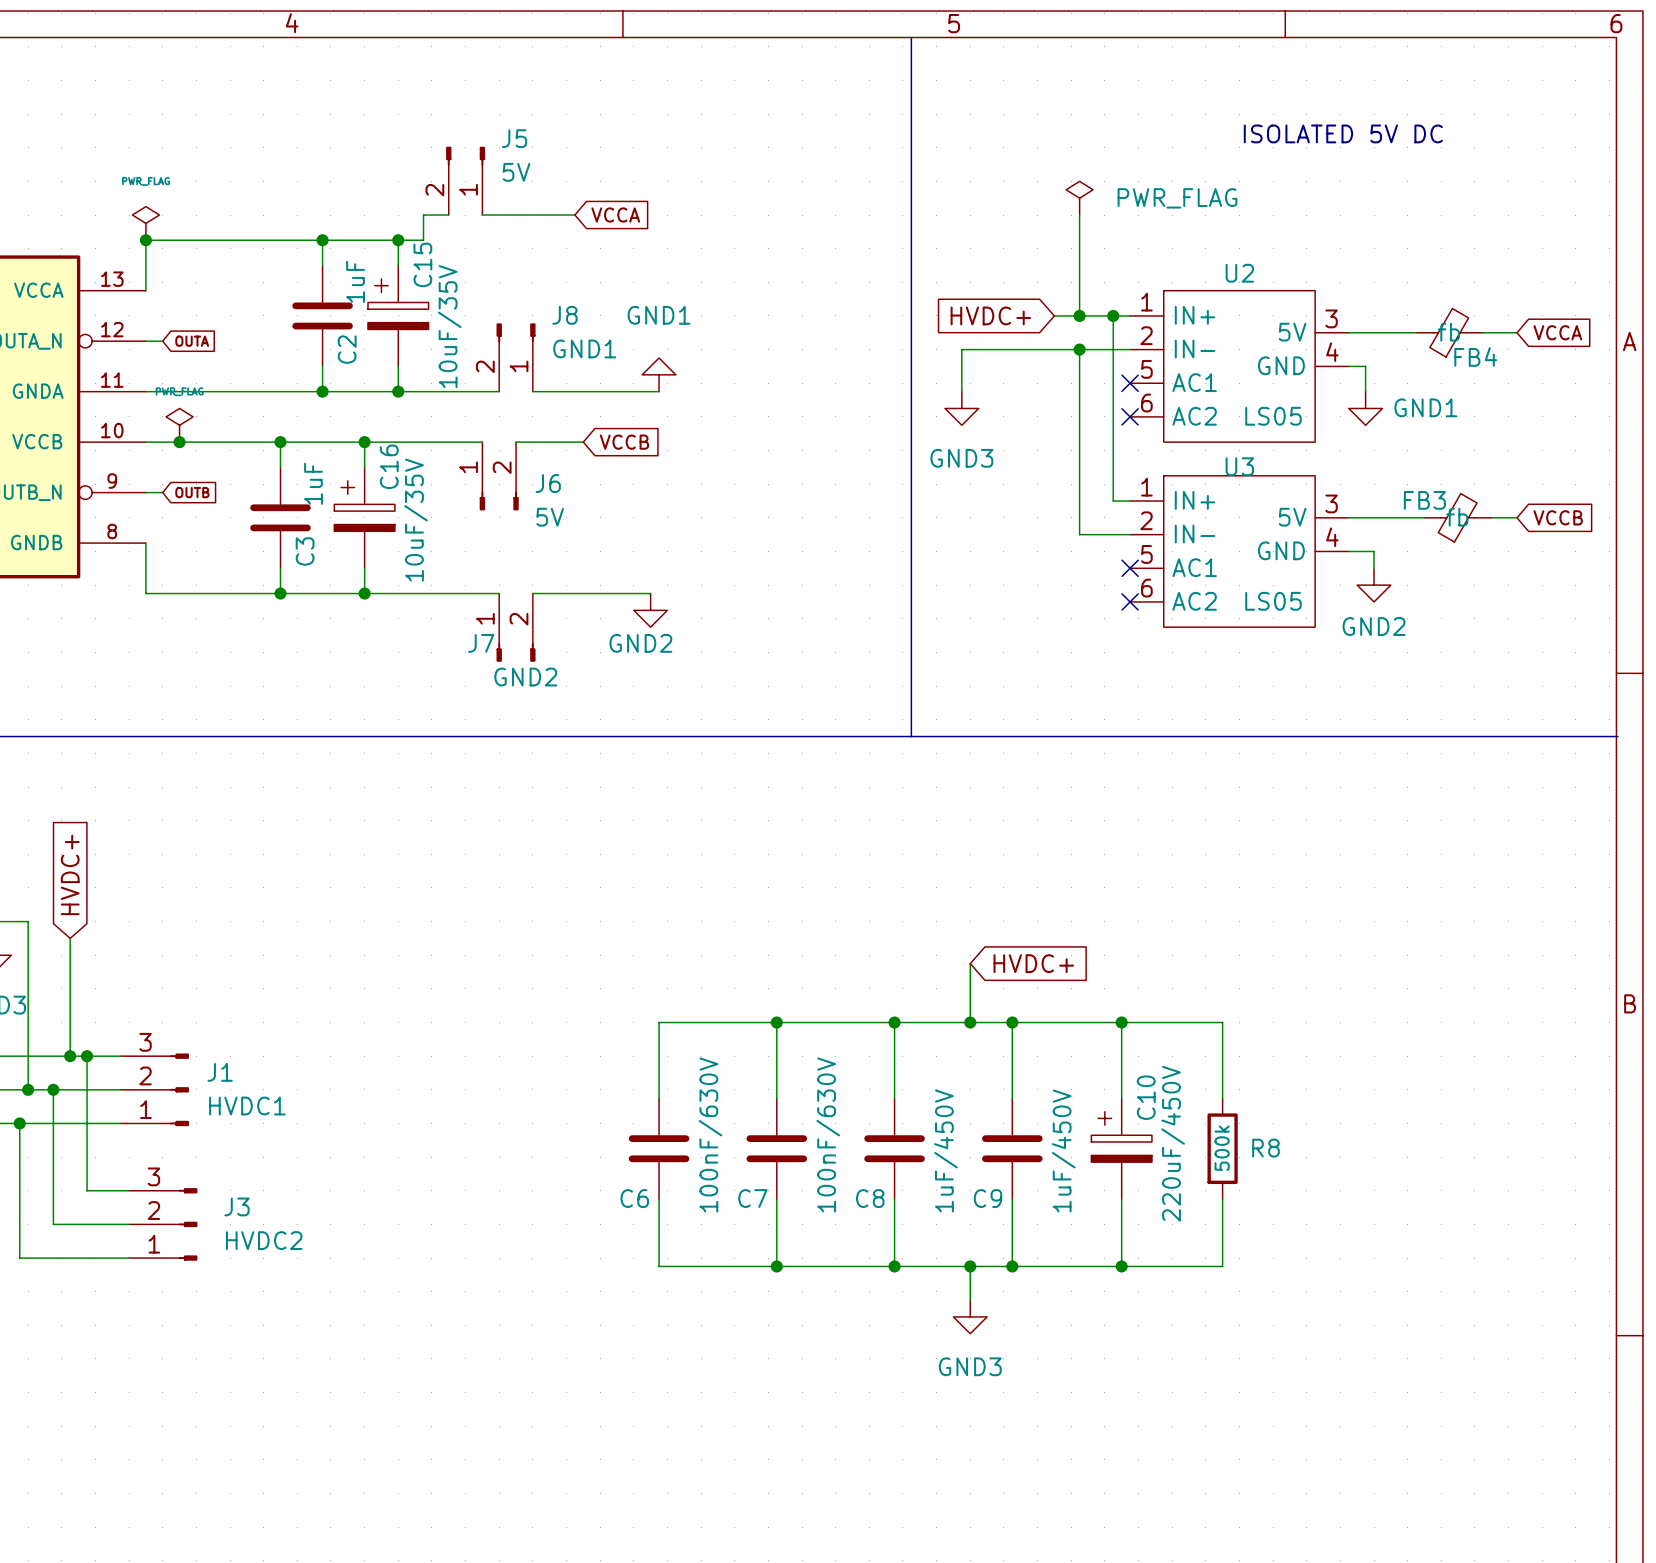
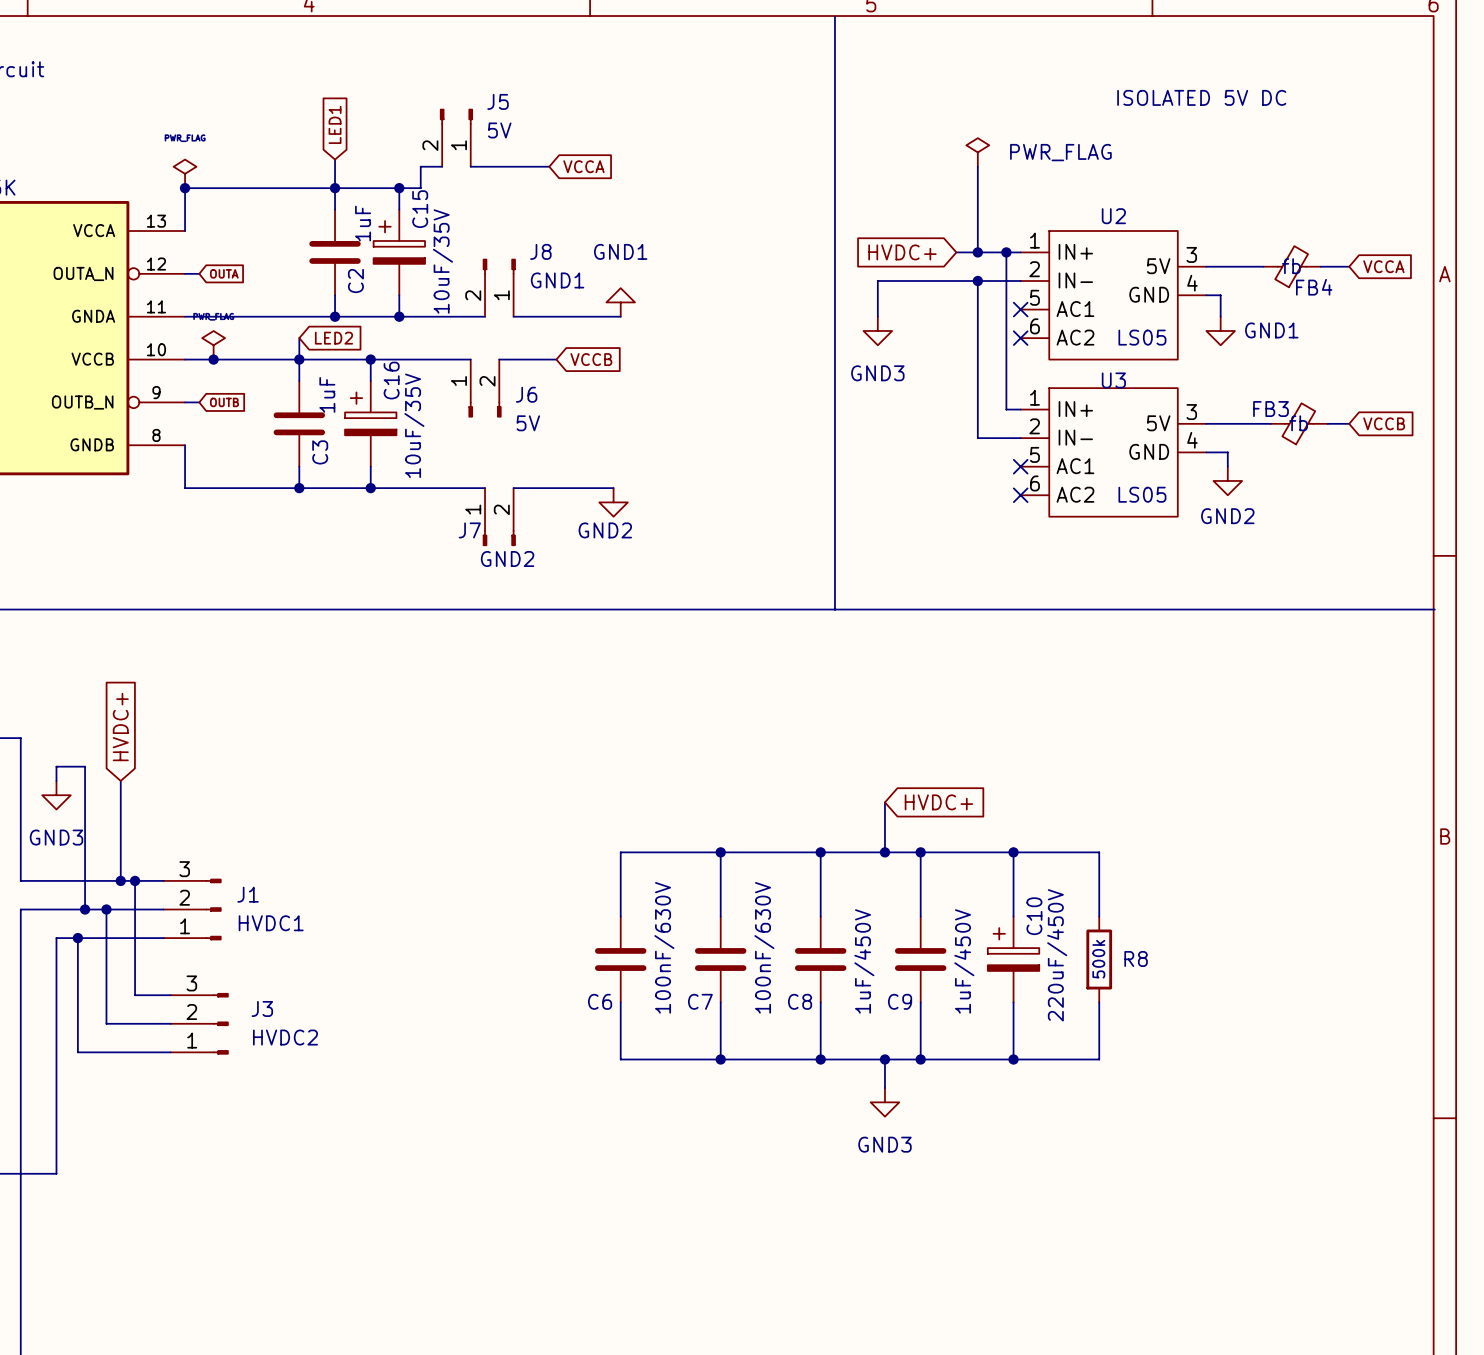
global label: none -> LED1 (335, 124)
wire: none -> (335, 159) (335, 188)
wire: none -> (299, 338) (299, 359)
global label: none -> LED2 (333, 338)

